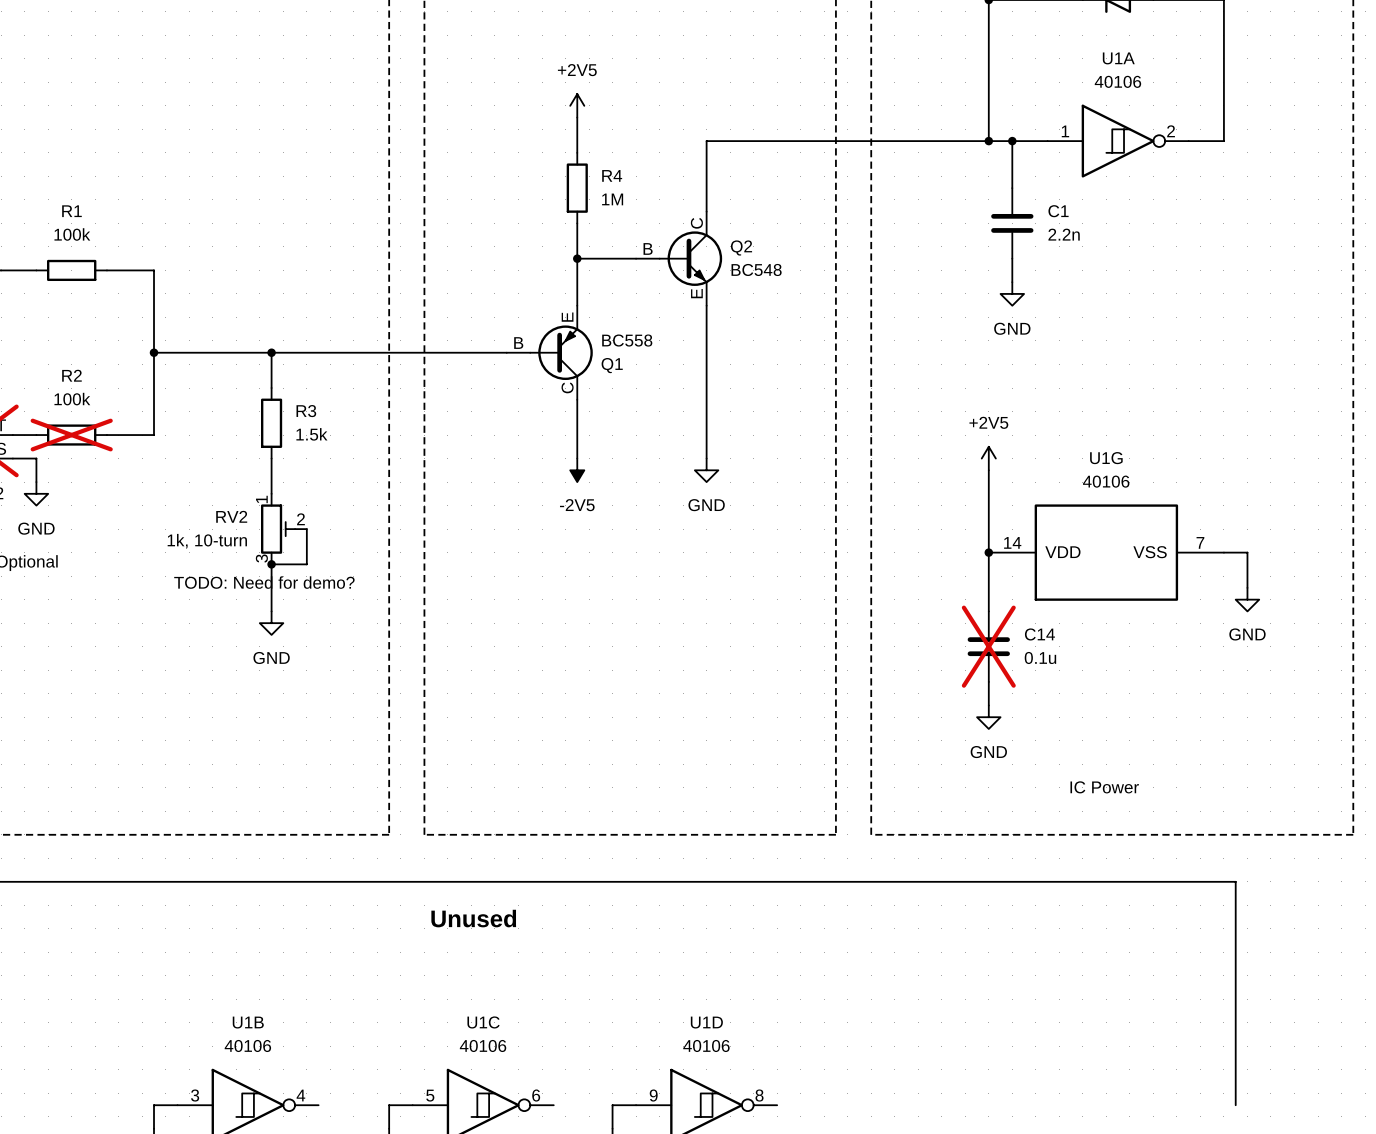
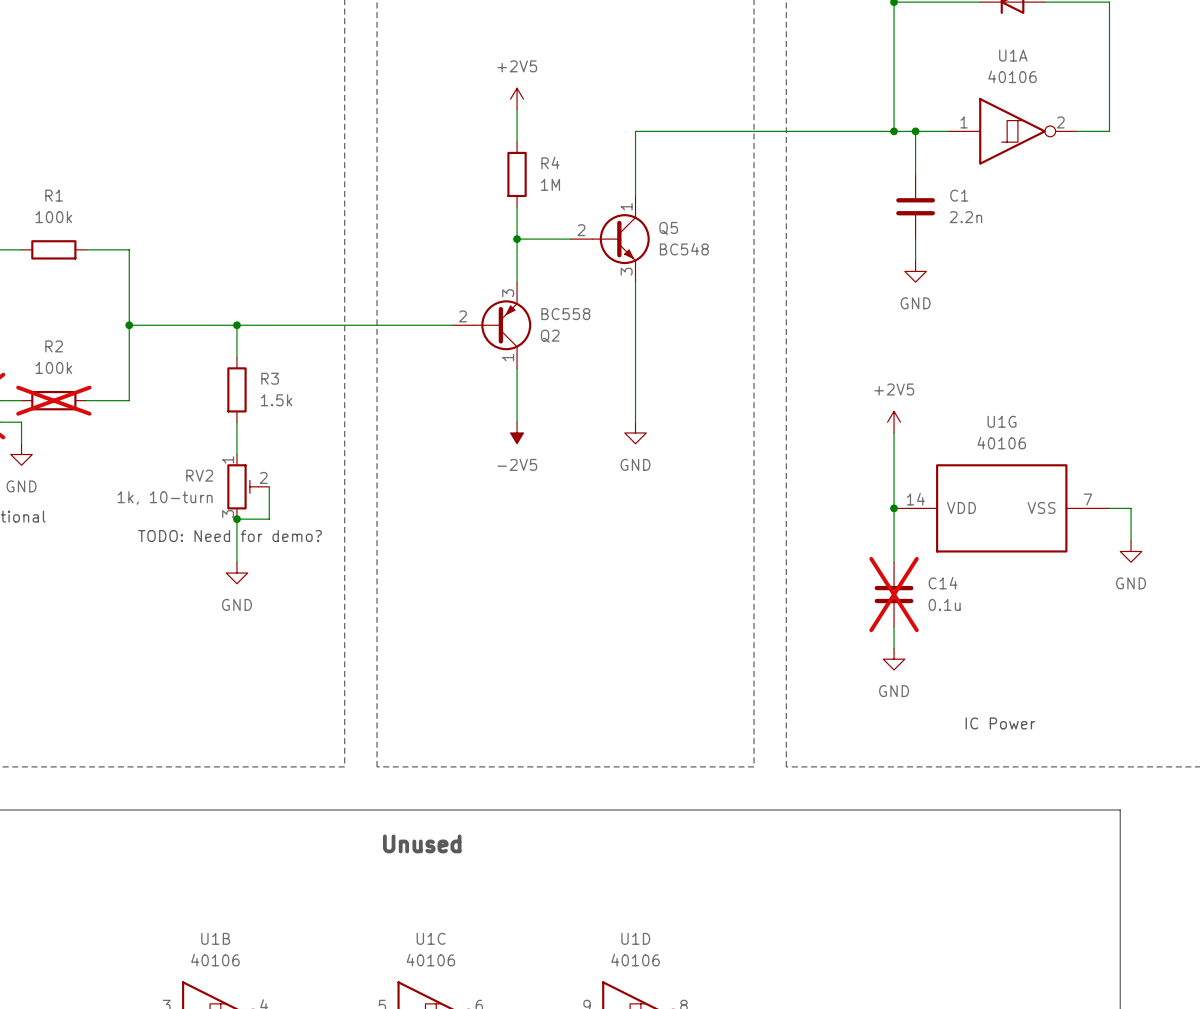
Q2 symbol: [636, 211, 723, 306] -> [452, 282, 532, 369]
Q2 name position: Q2 (741, 248) -> Q2 (550, 336)
Q5: none -> BC548 (610, 239)
Q1: BC558 (549, 352) -> none

